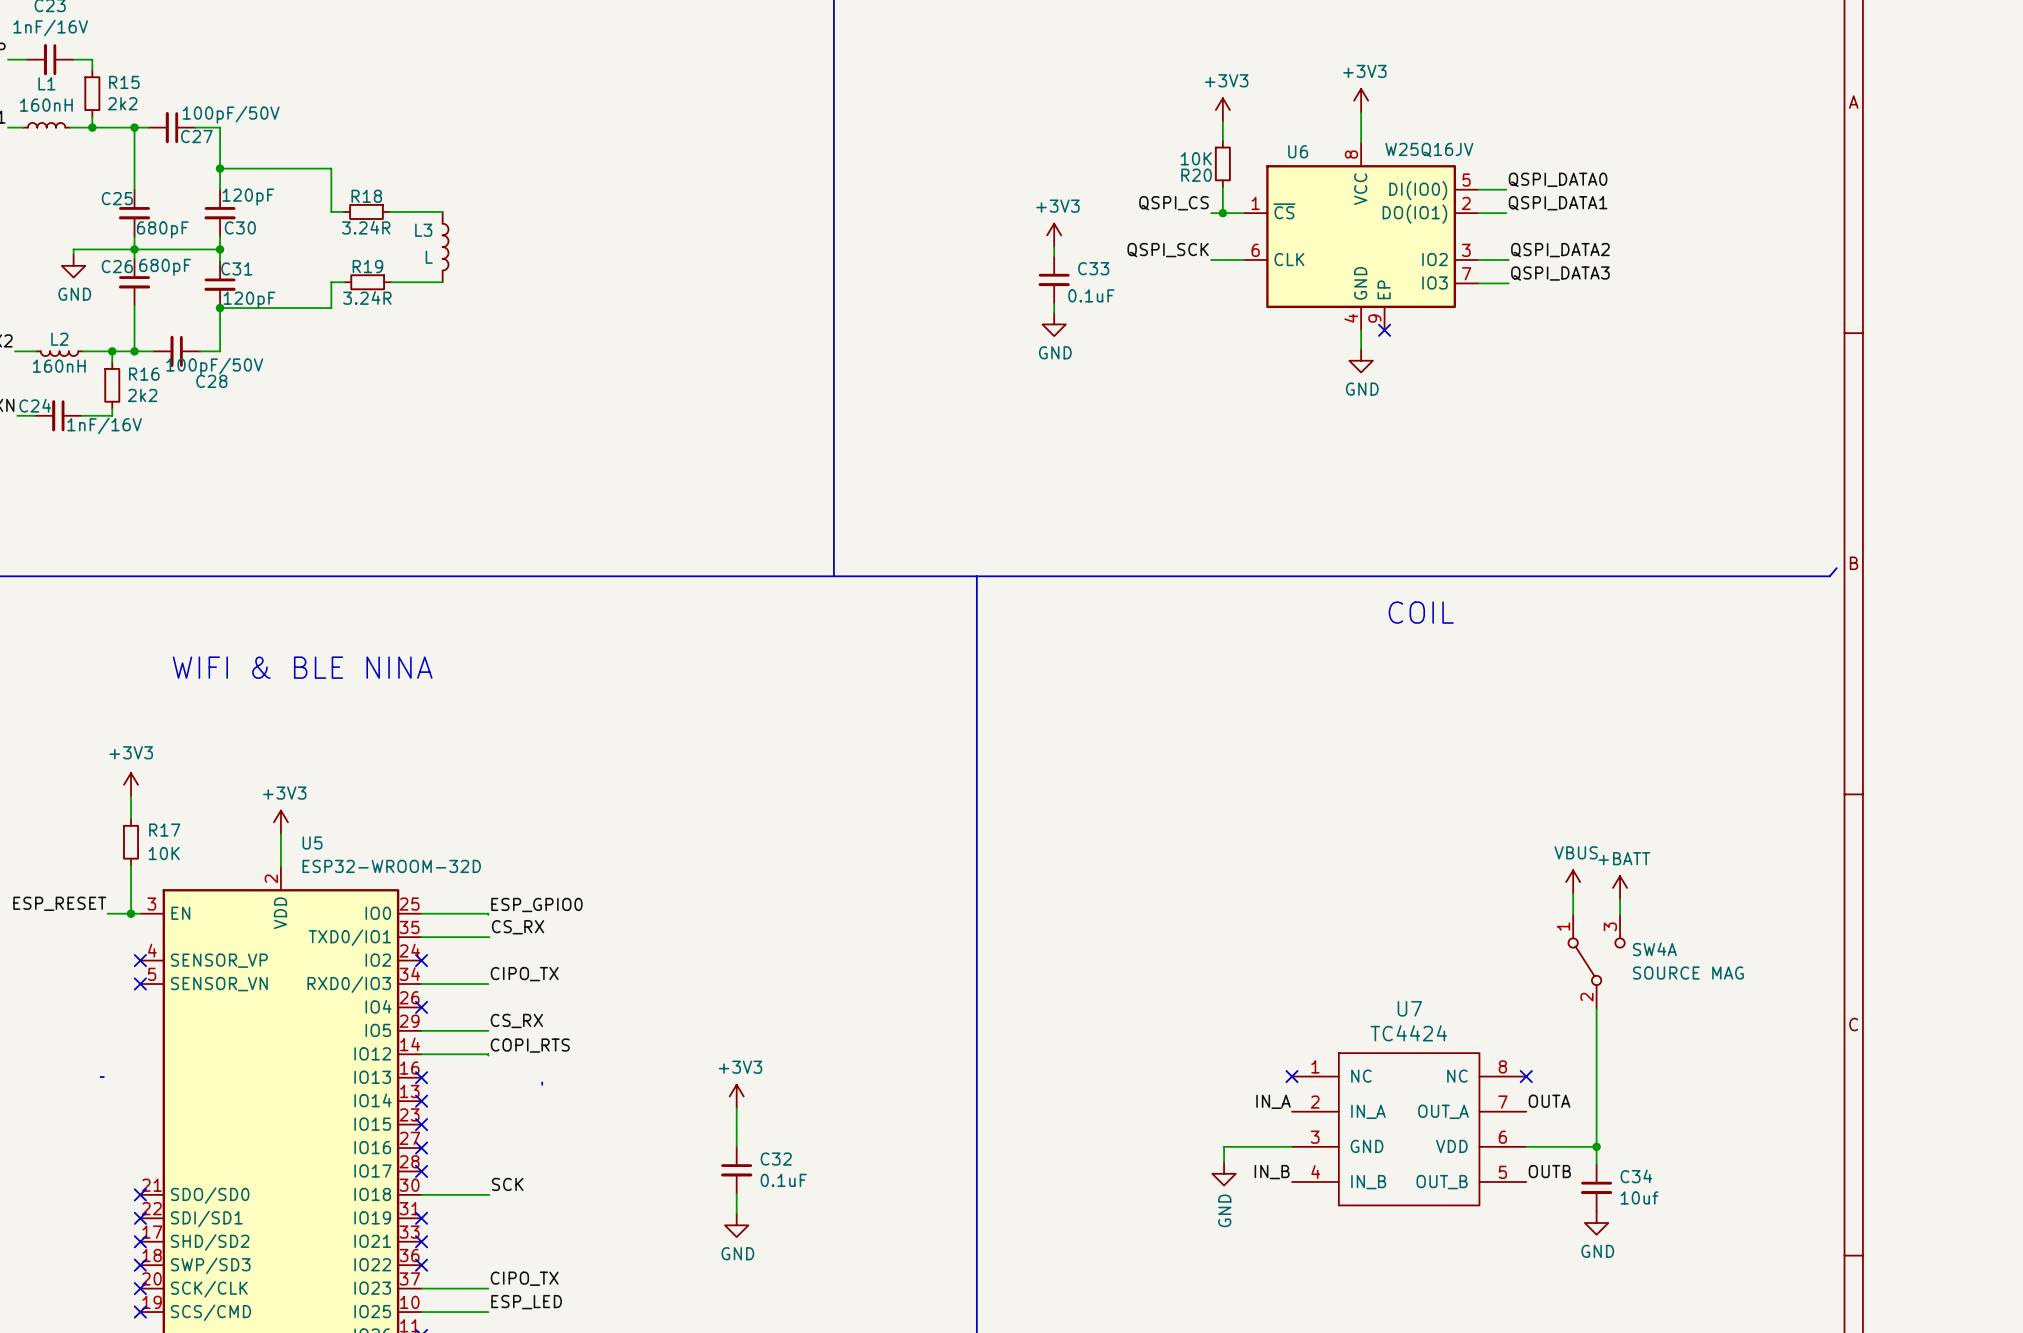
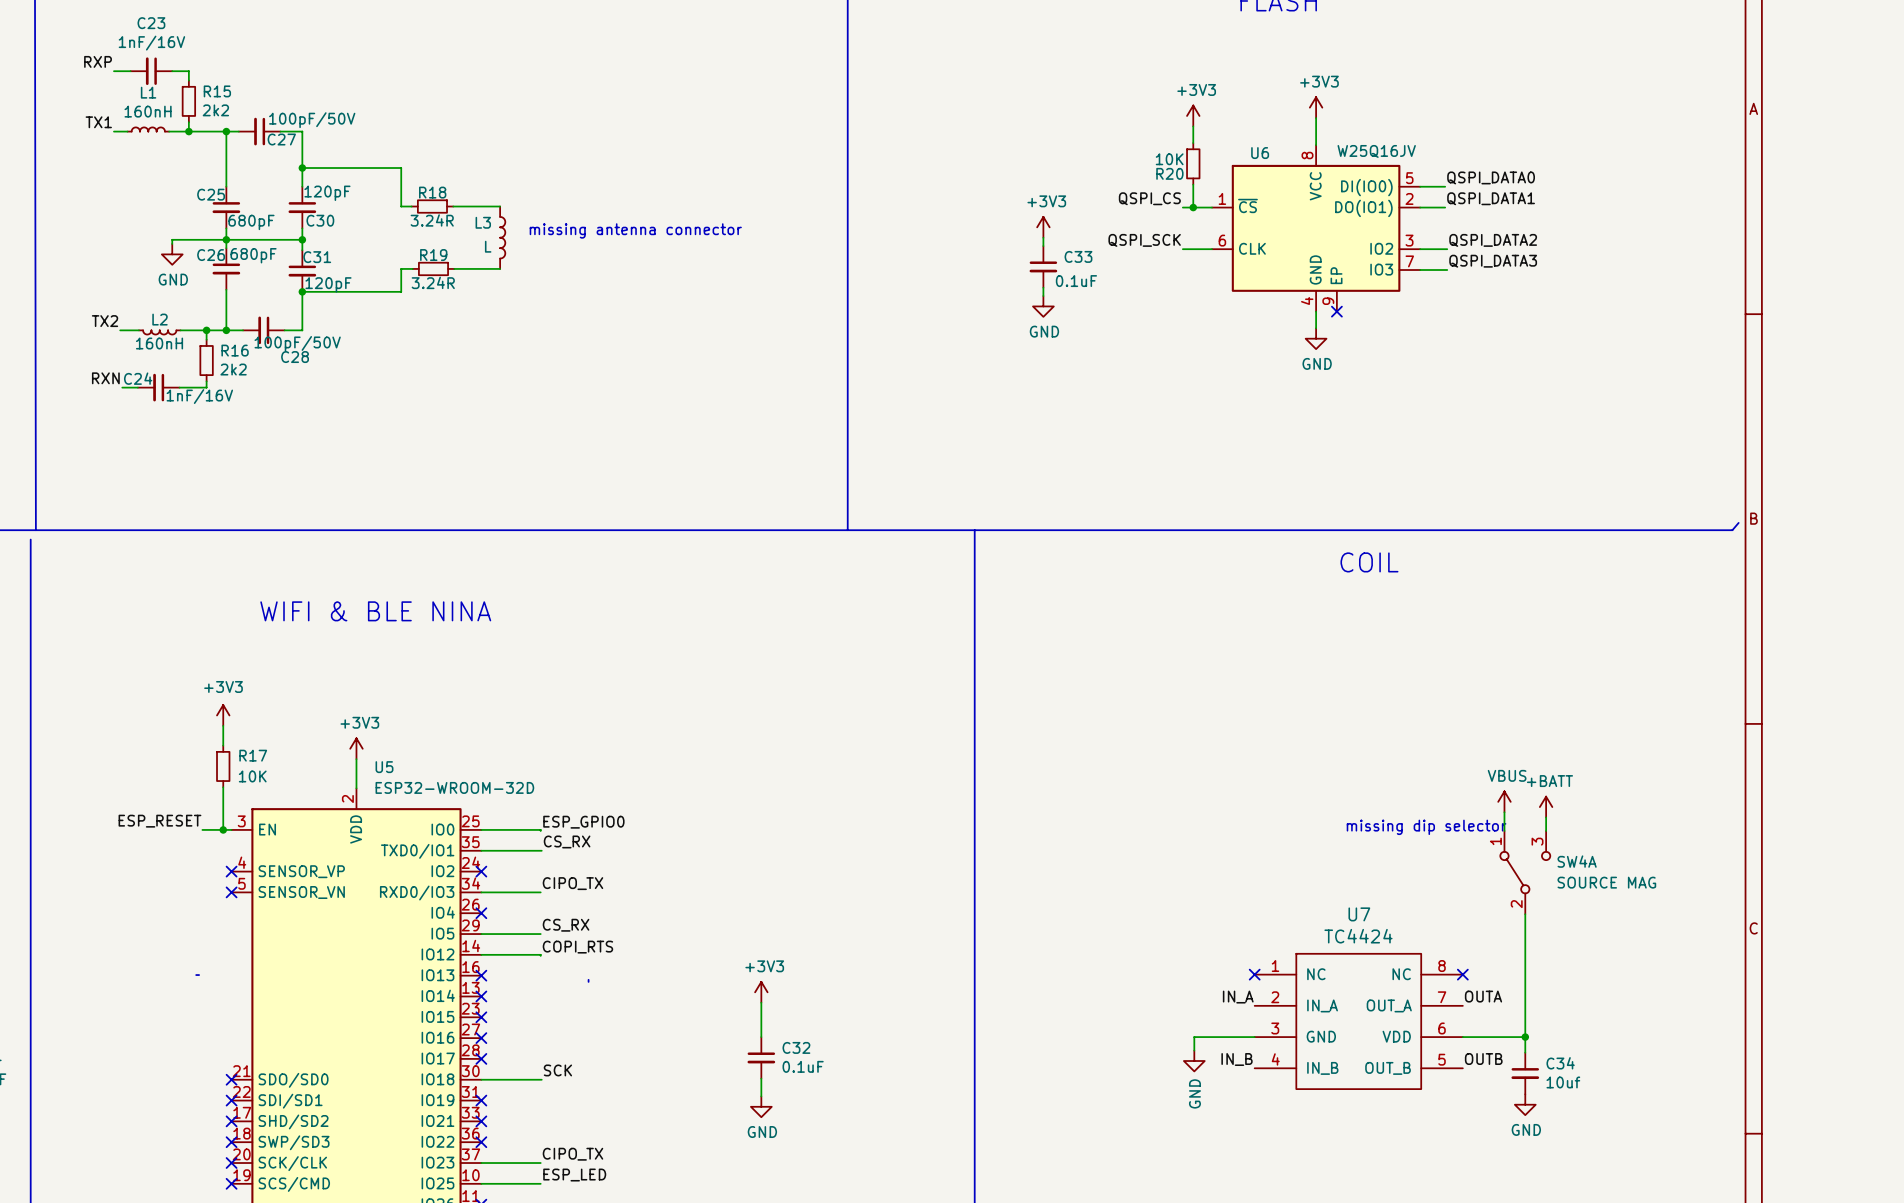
text: none -> missing antenna connector (635, 230)
text: none -> missing dip selector (1426, 827)

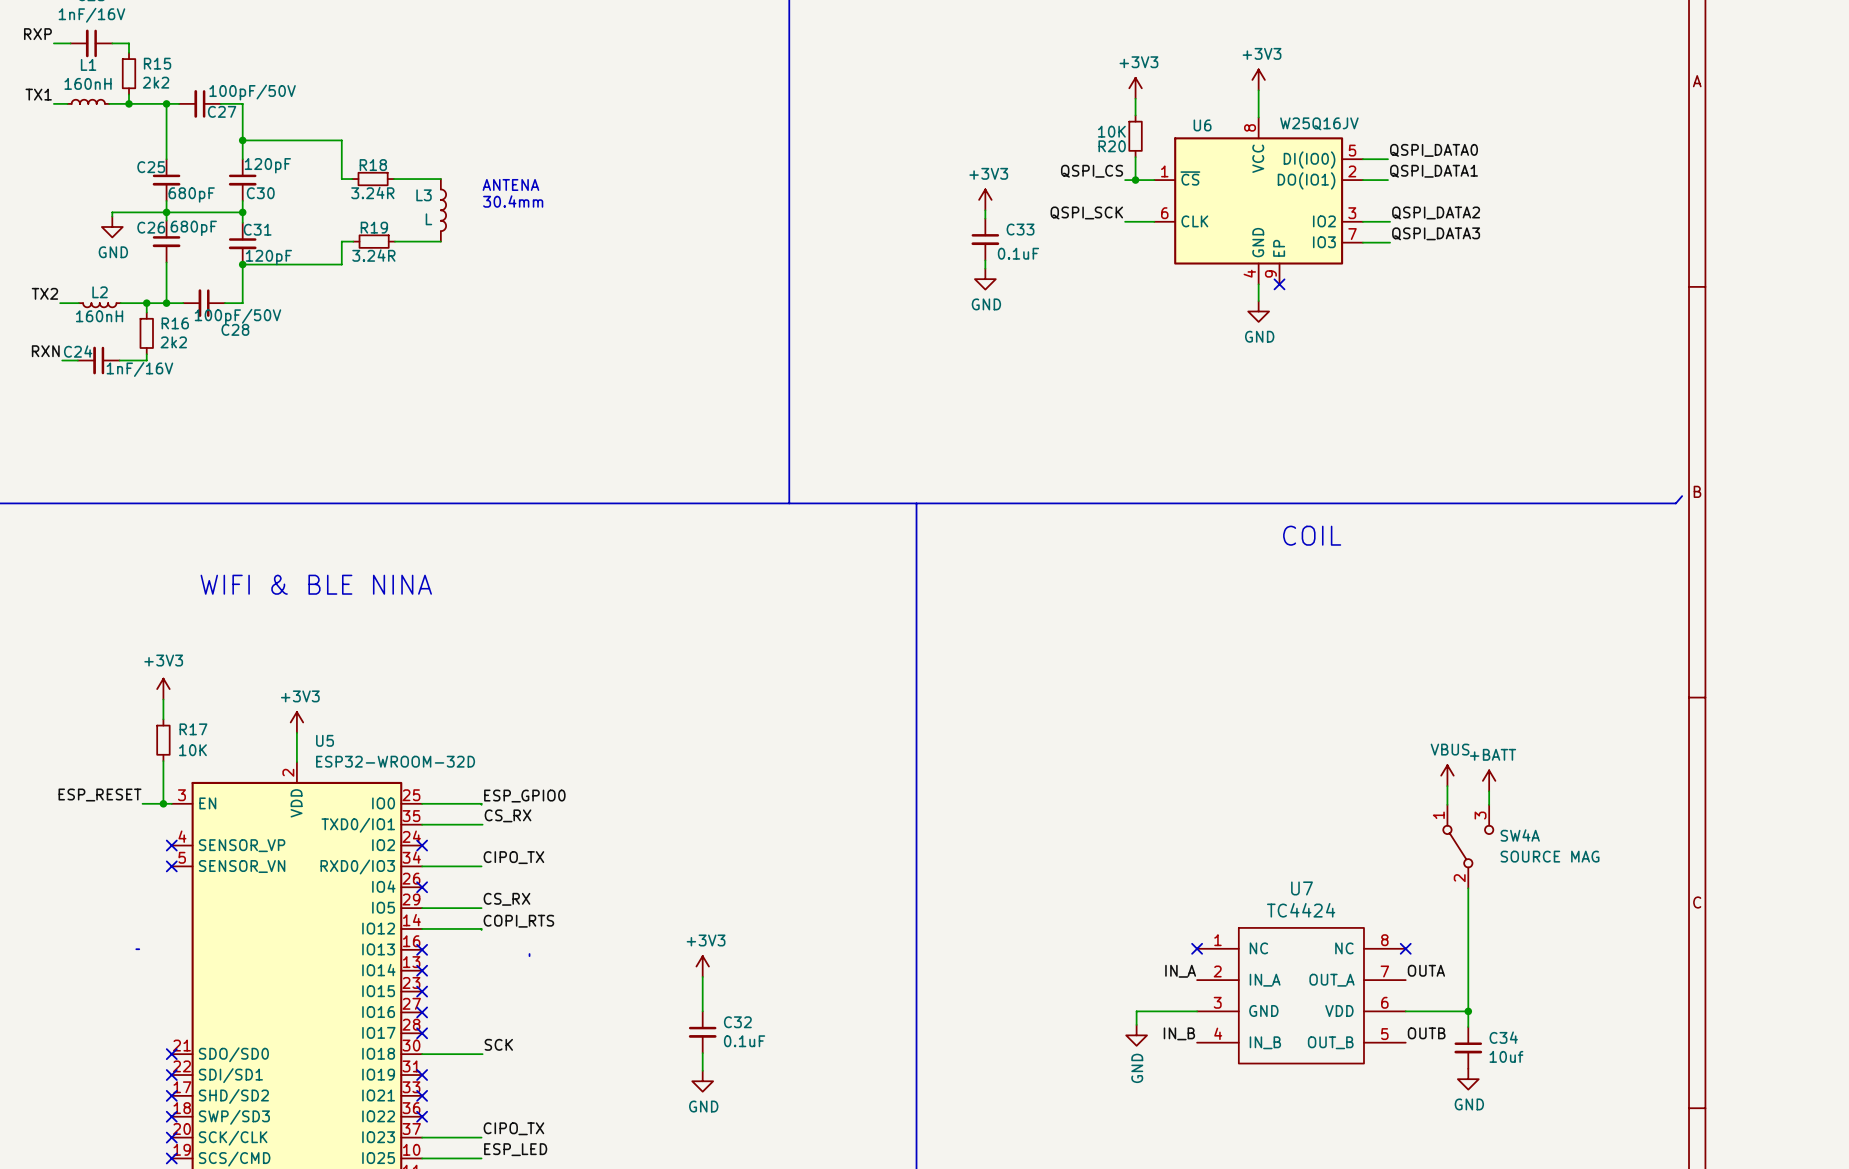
text: none -> ANTENA (510, 184)
text: none -> 30.4mm (513, 201)
text: missing antenna connector (635, 230) -> none
text: missing dip selector (1426, 827) -> none

